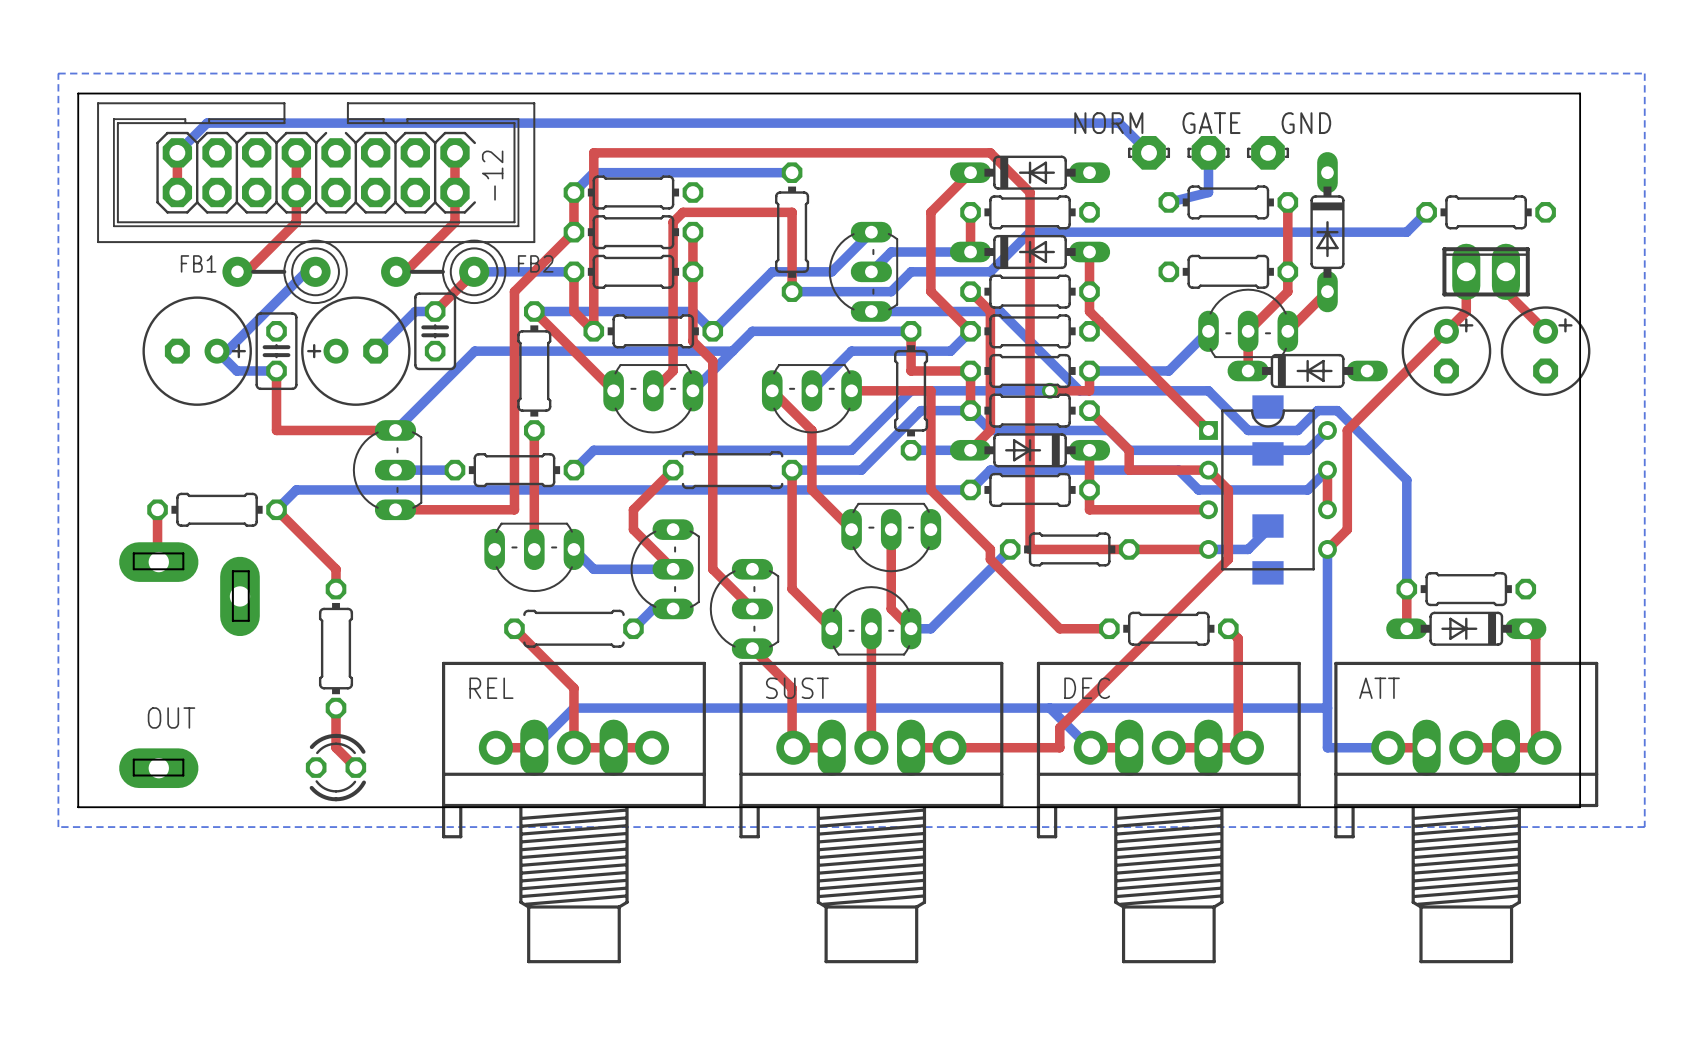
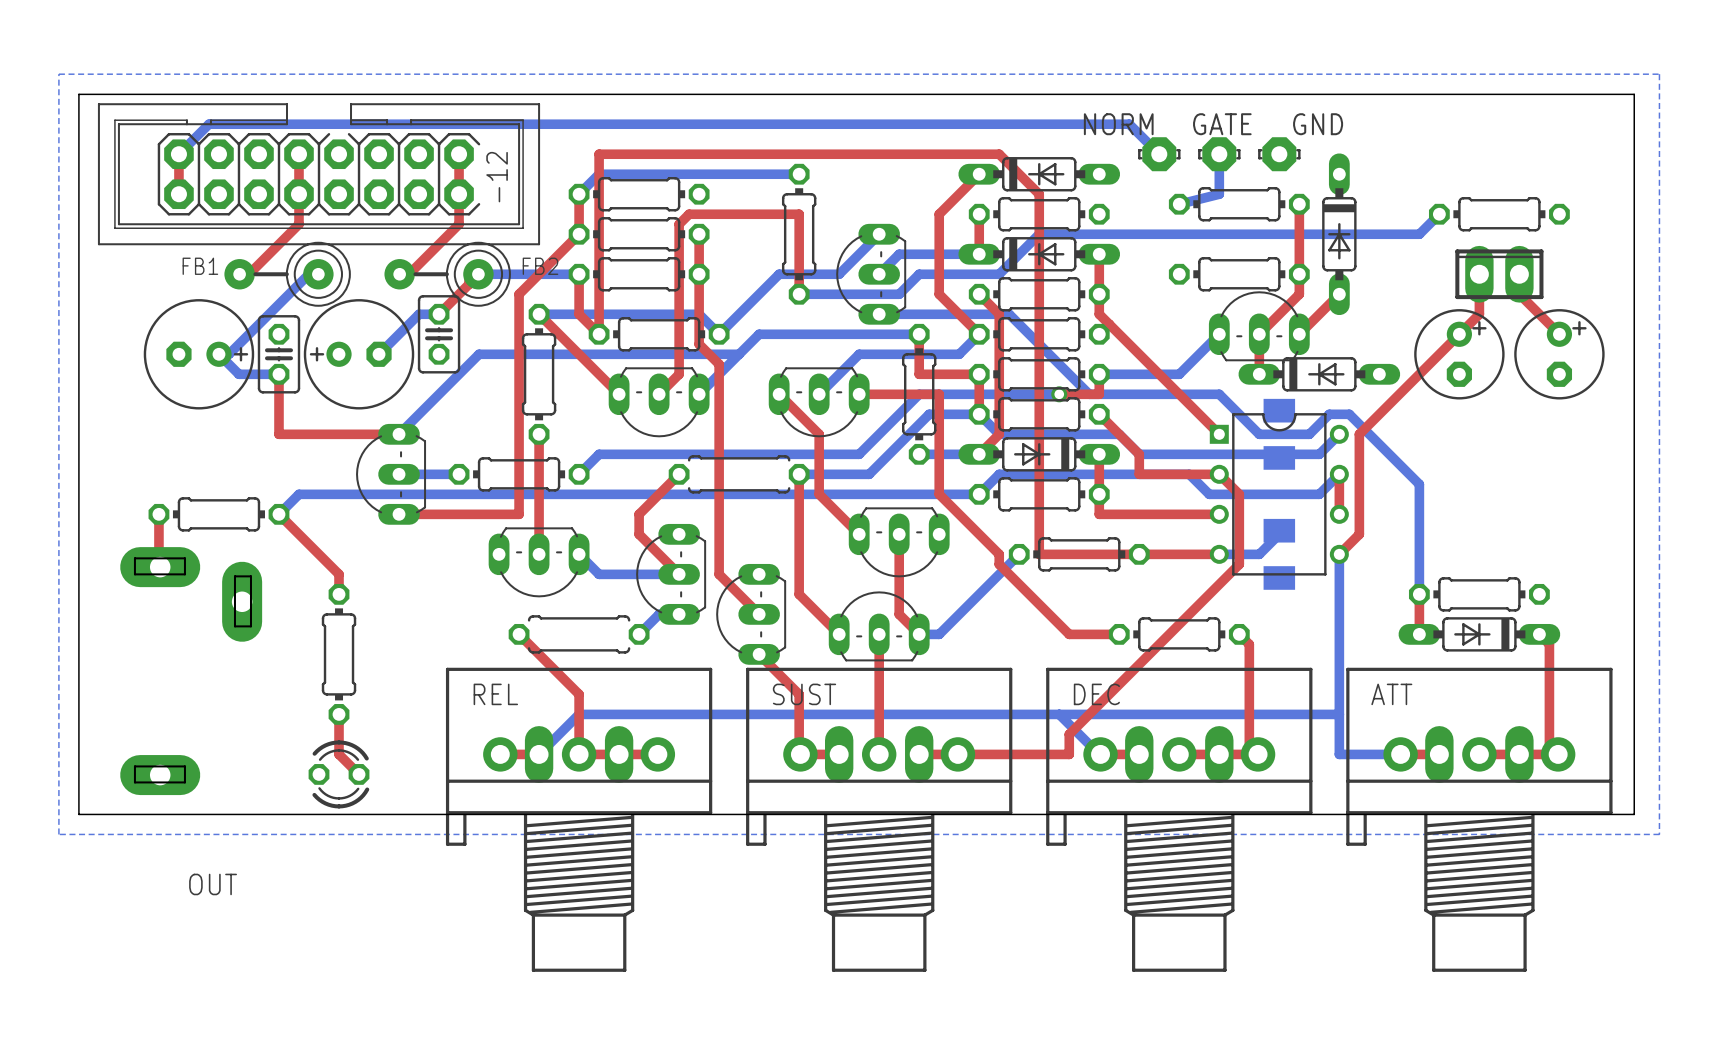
board edge: (1580, 93) (1580, 807) -> (1594, 94) (1634, 94) (1634, 814) (1594, 814)
OUT name position: OUT (171, 717) -> OUT (213, 884)

